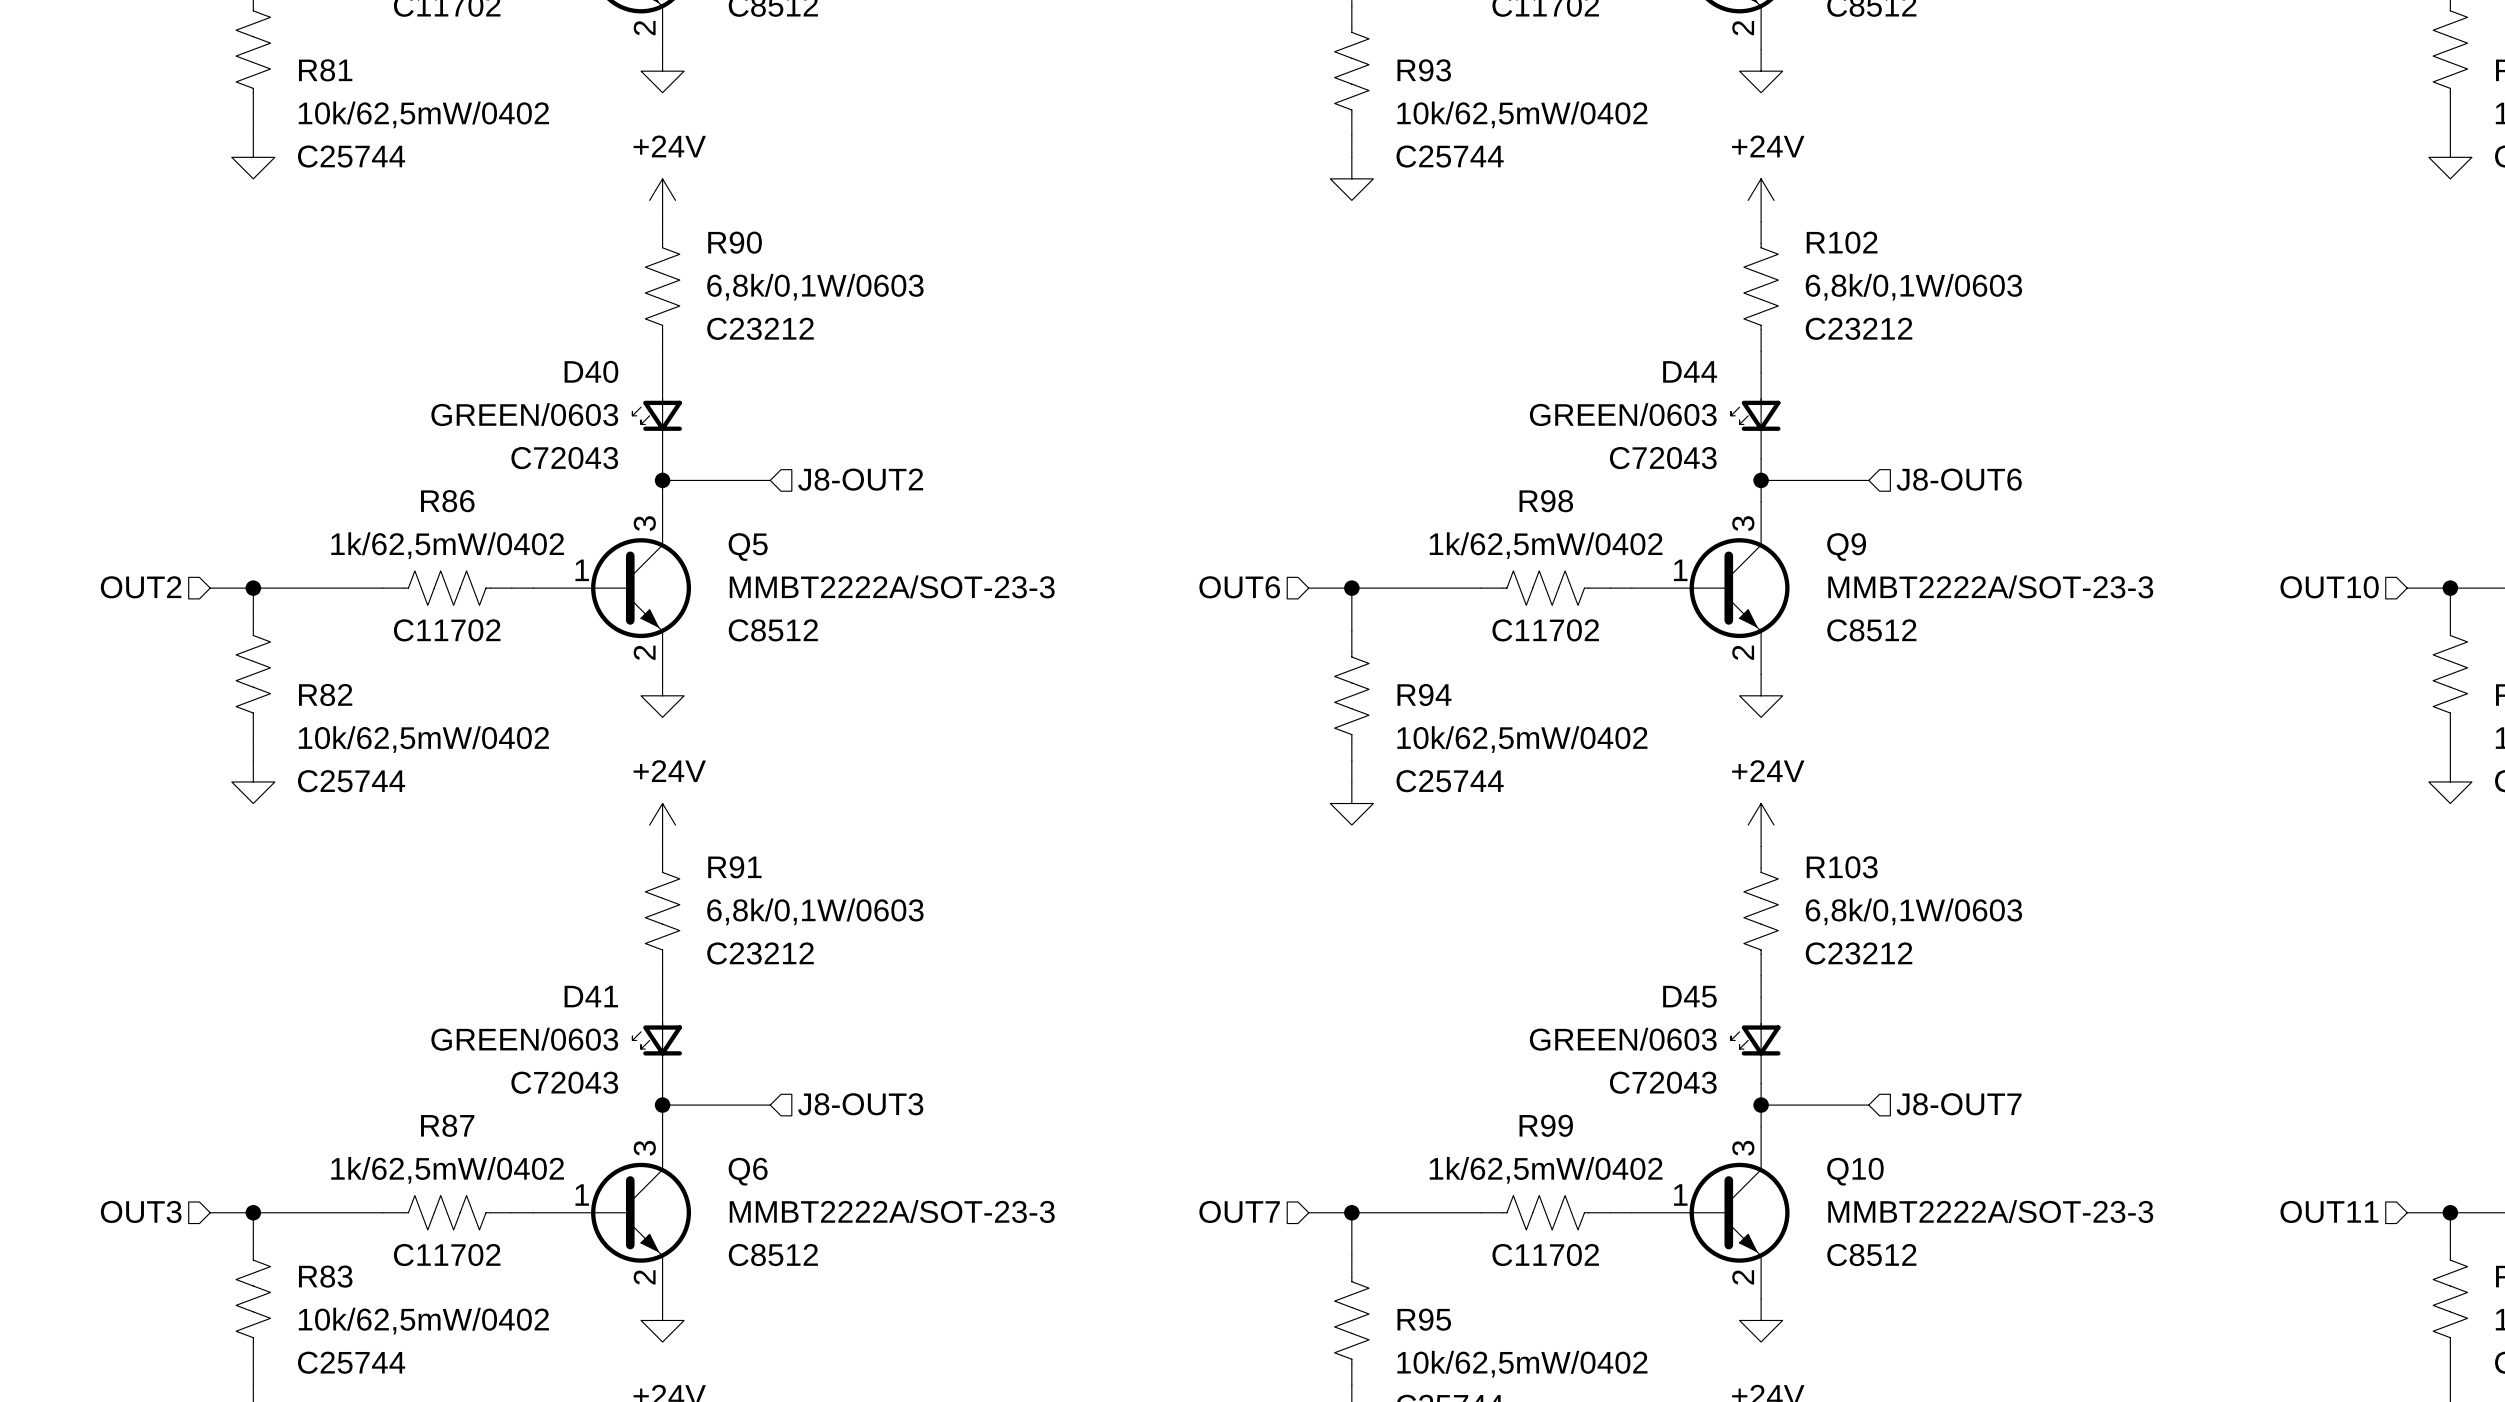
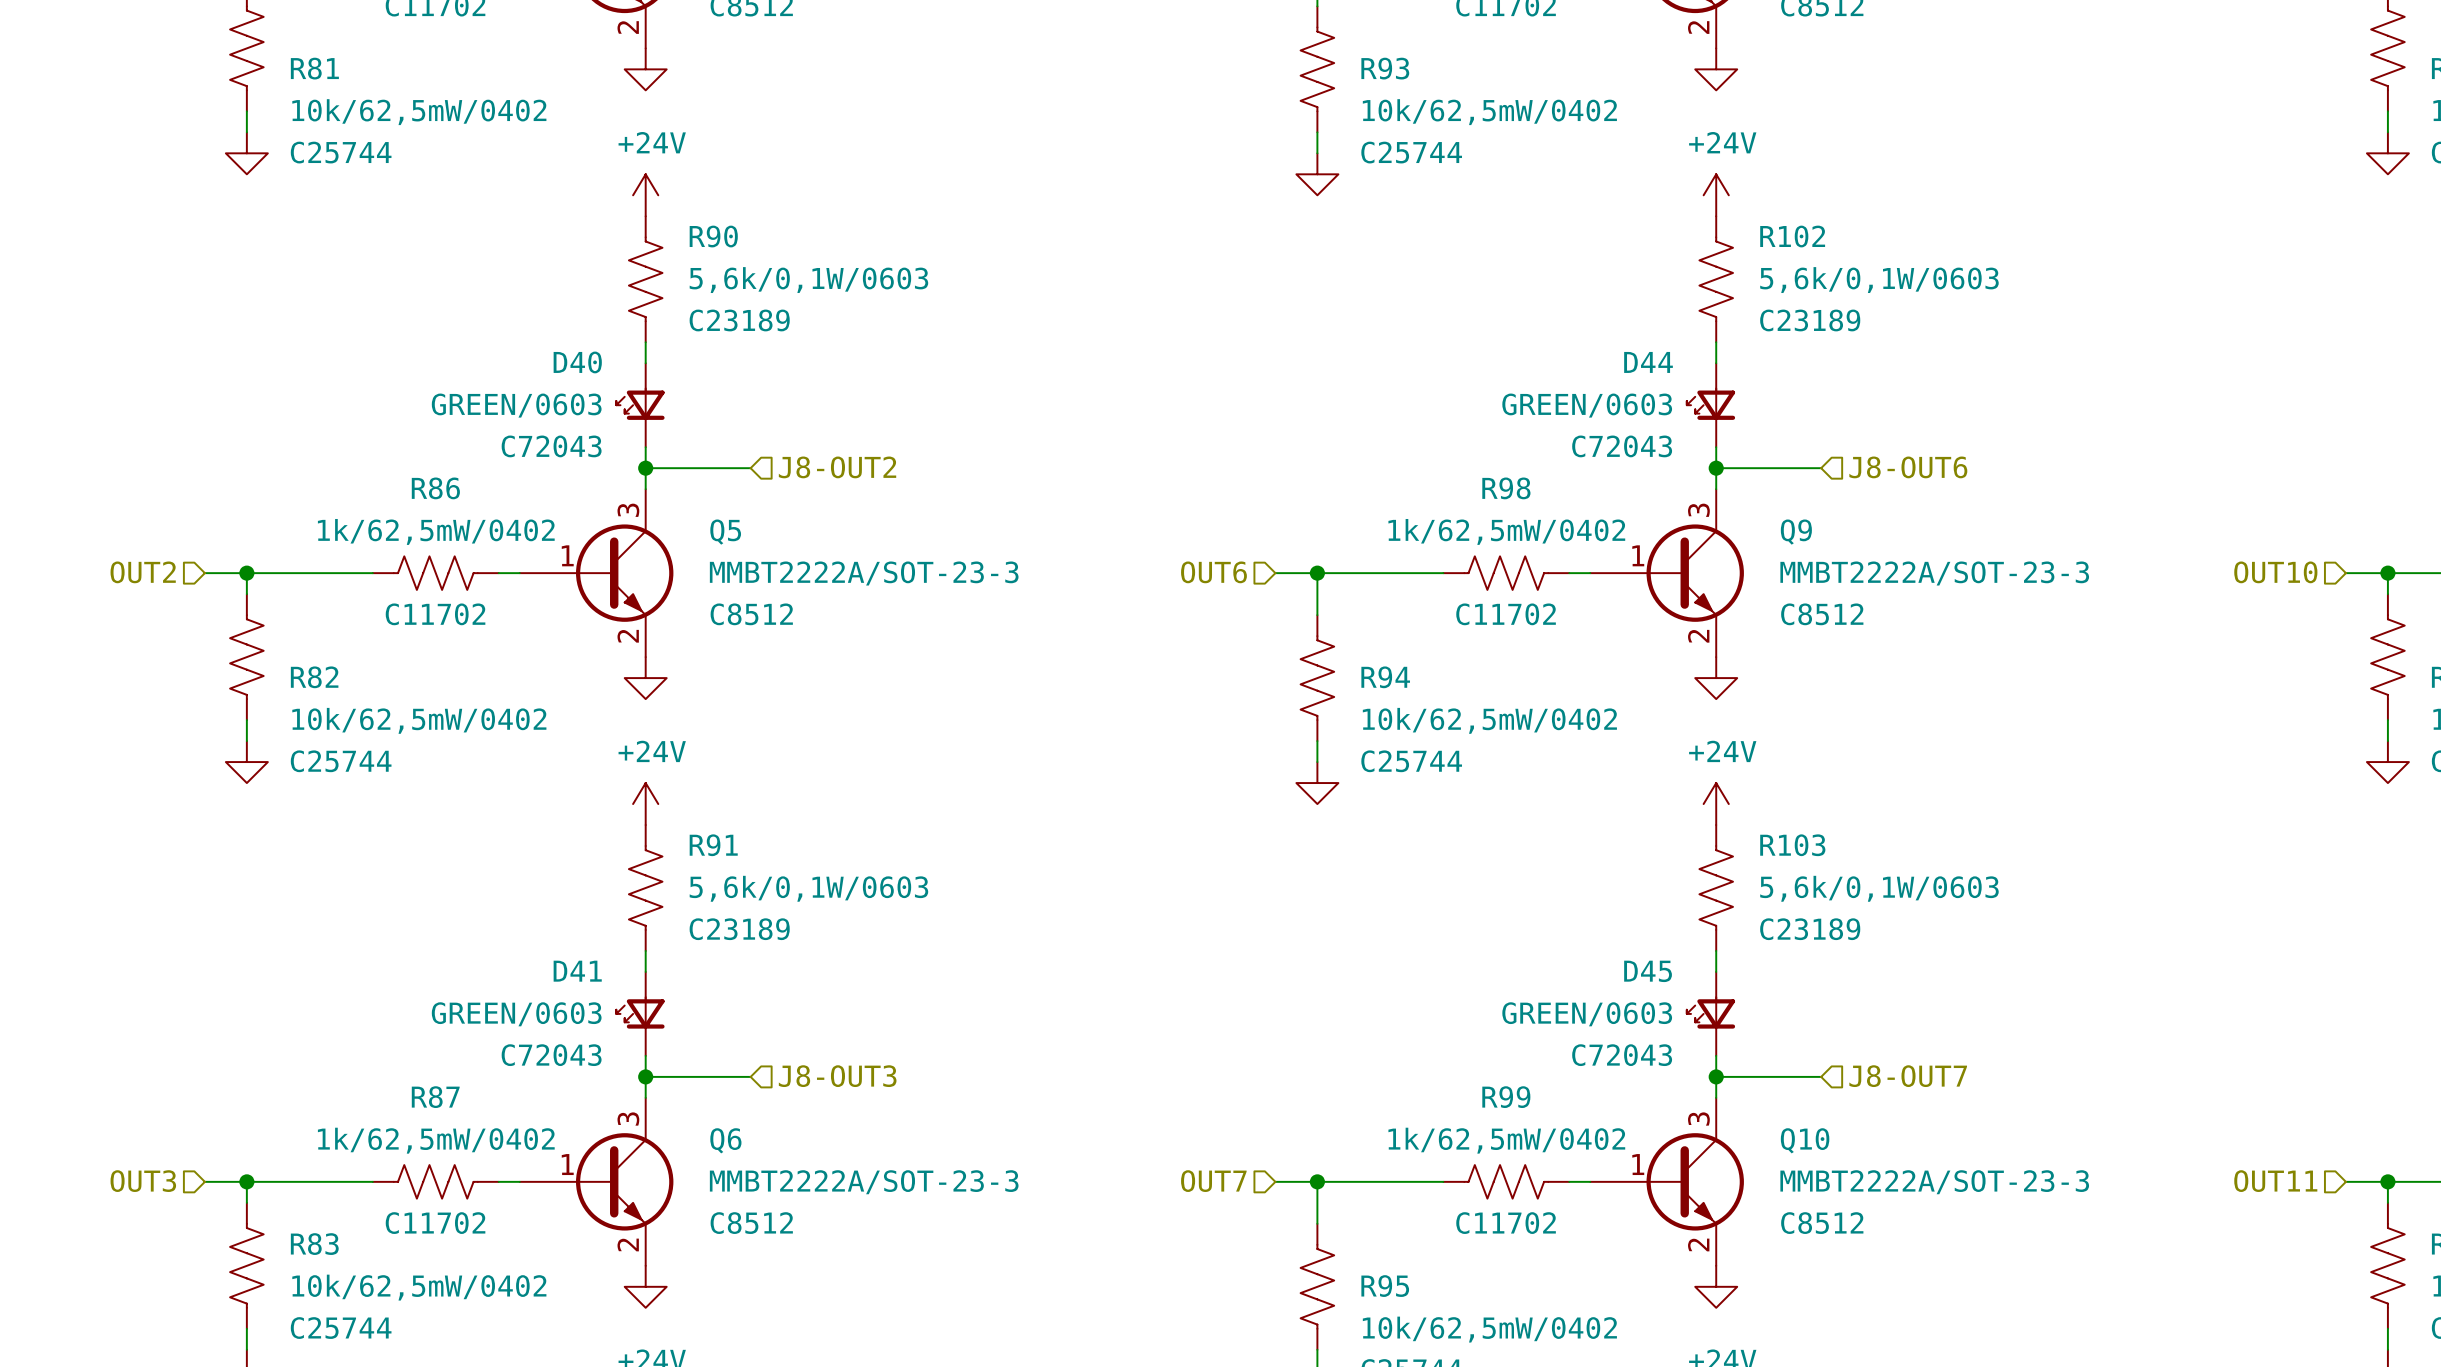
R90 value: 6,8k/0,1W/0603 (815, 287) -> 5,6k/0,1W/0603 (808, 280)
R102 value: 6,8k/0,1W/0603 (1913, 287) -> 5,6k/0,1W/0603 (1879, 280)
R90 text: C23212 (760, 328) -> C23189 (739, 320)
R102 text: C23212 (1859, 328) -> C23189 (1810, 320)
R91 value: 6,8k/0,1W/0603 (815, 911) -> 5,6k/0,1W/0603 (808, 888)
R103 value: 6,8k/0,1W/0603 (1913, 911) -> 5,6k/0,1W/0603 (1879, 888)
R91 text: C23212 (760, 953) -> C23189 (739, 929)
R103 text: C23212 (1859, 953) -> C23189 (1810, 929)

